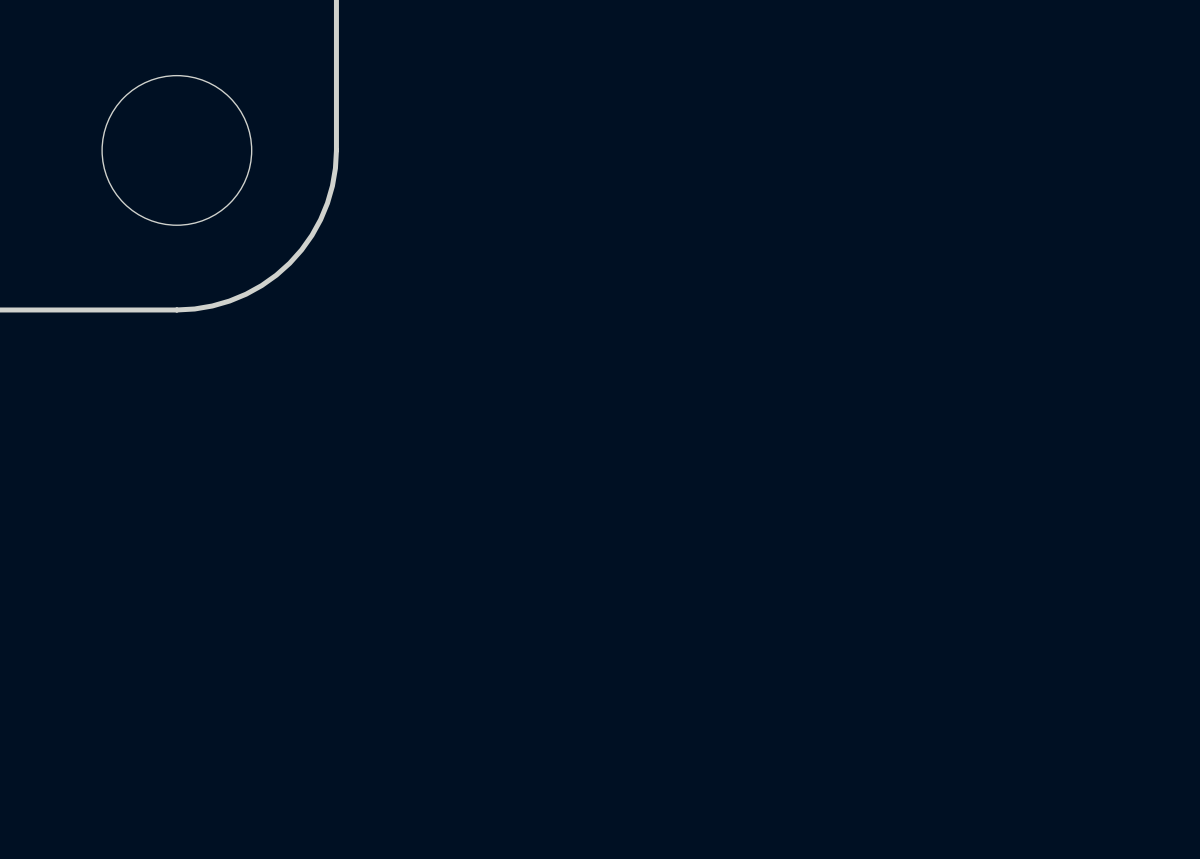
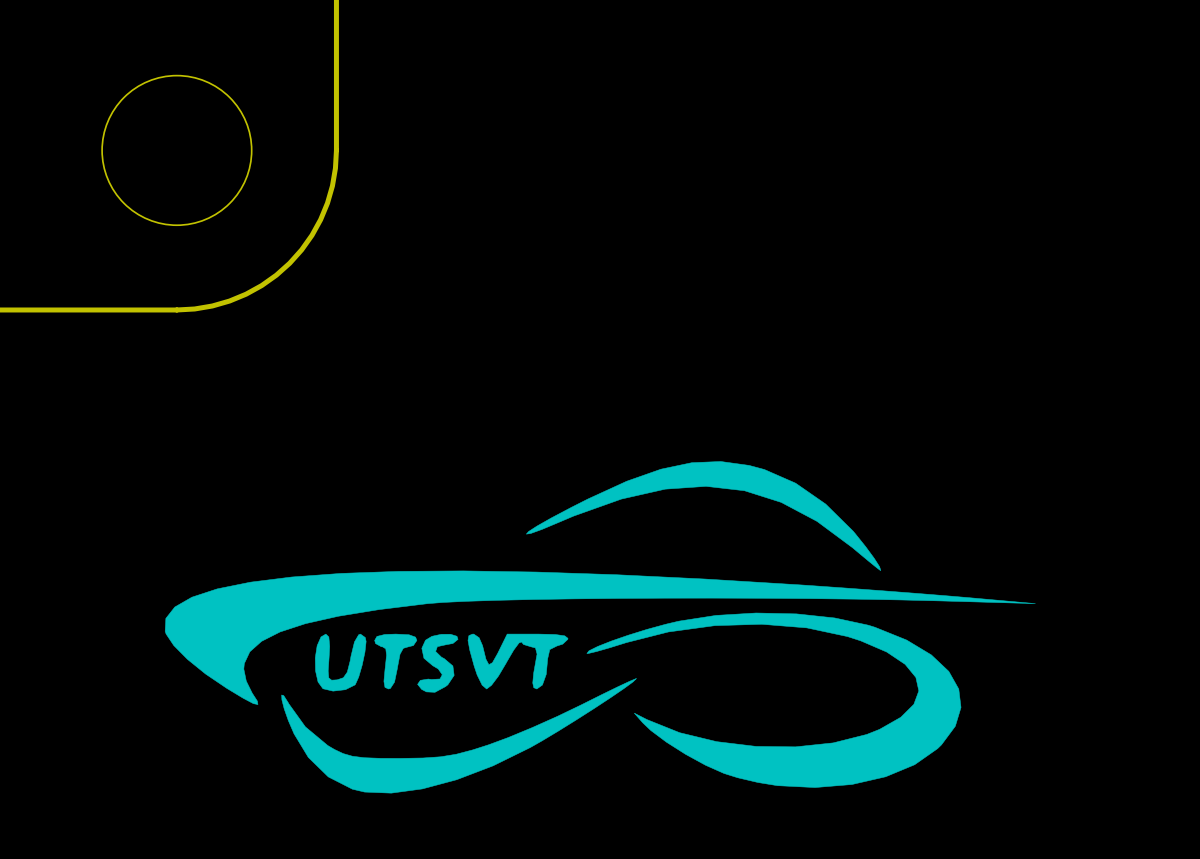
drawing: none -> [164, 461, 1036, 794]

